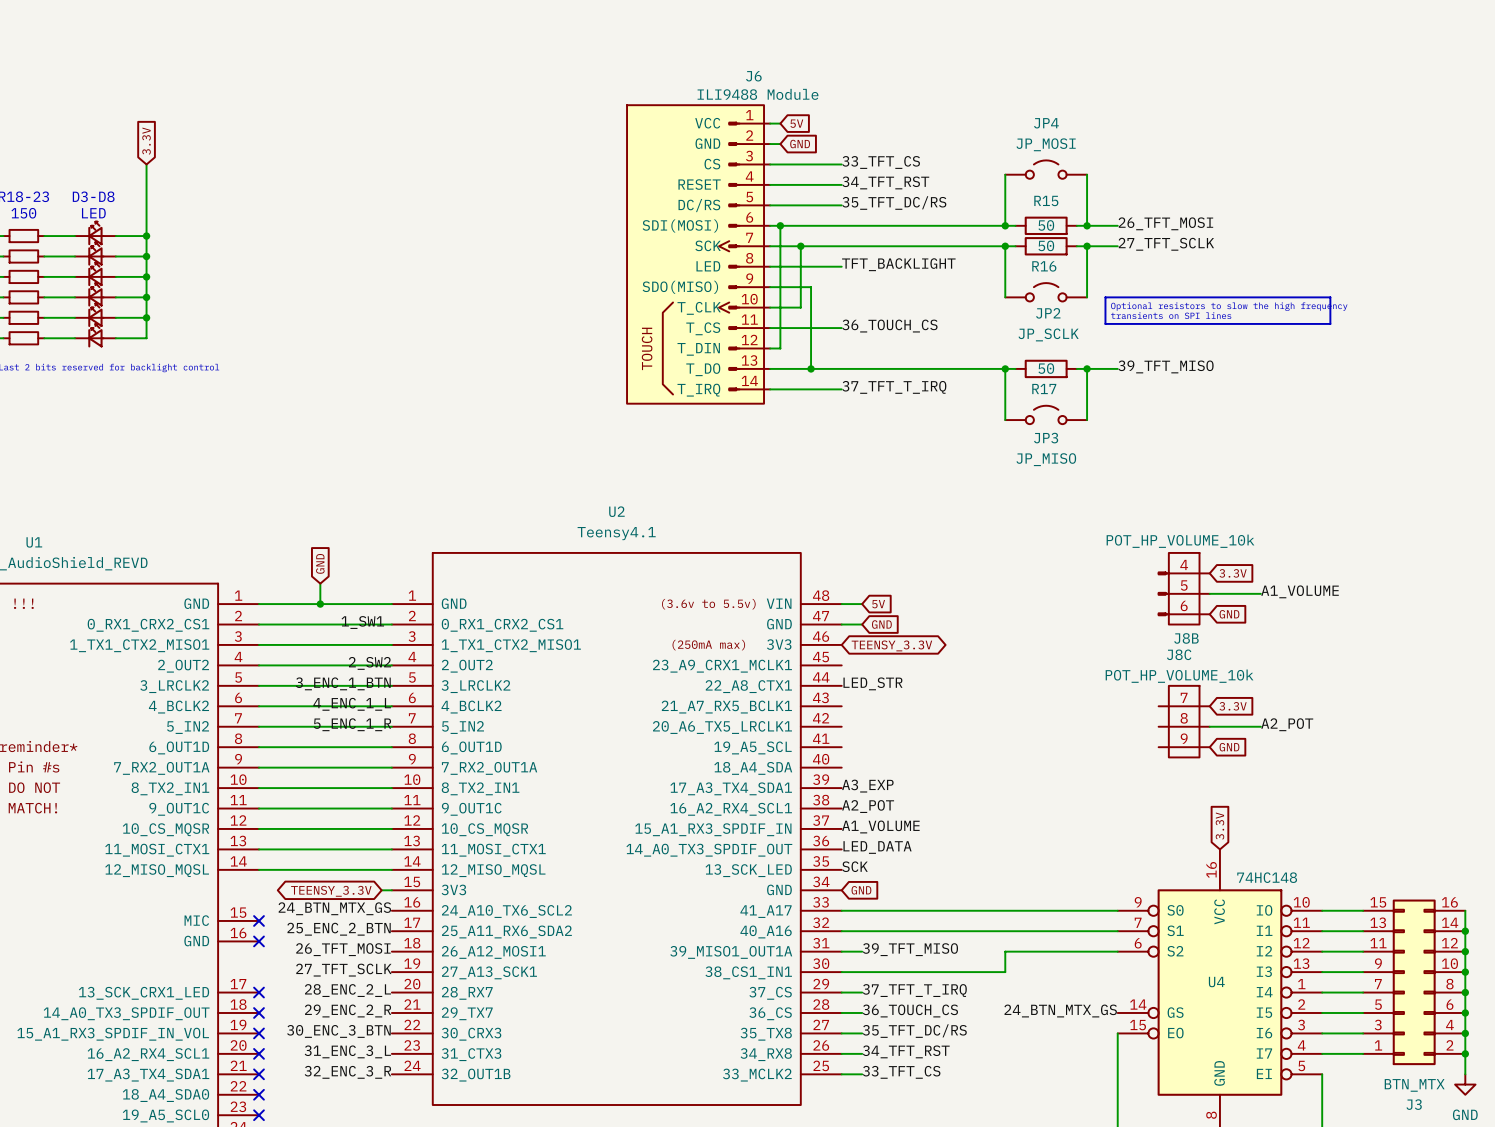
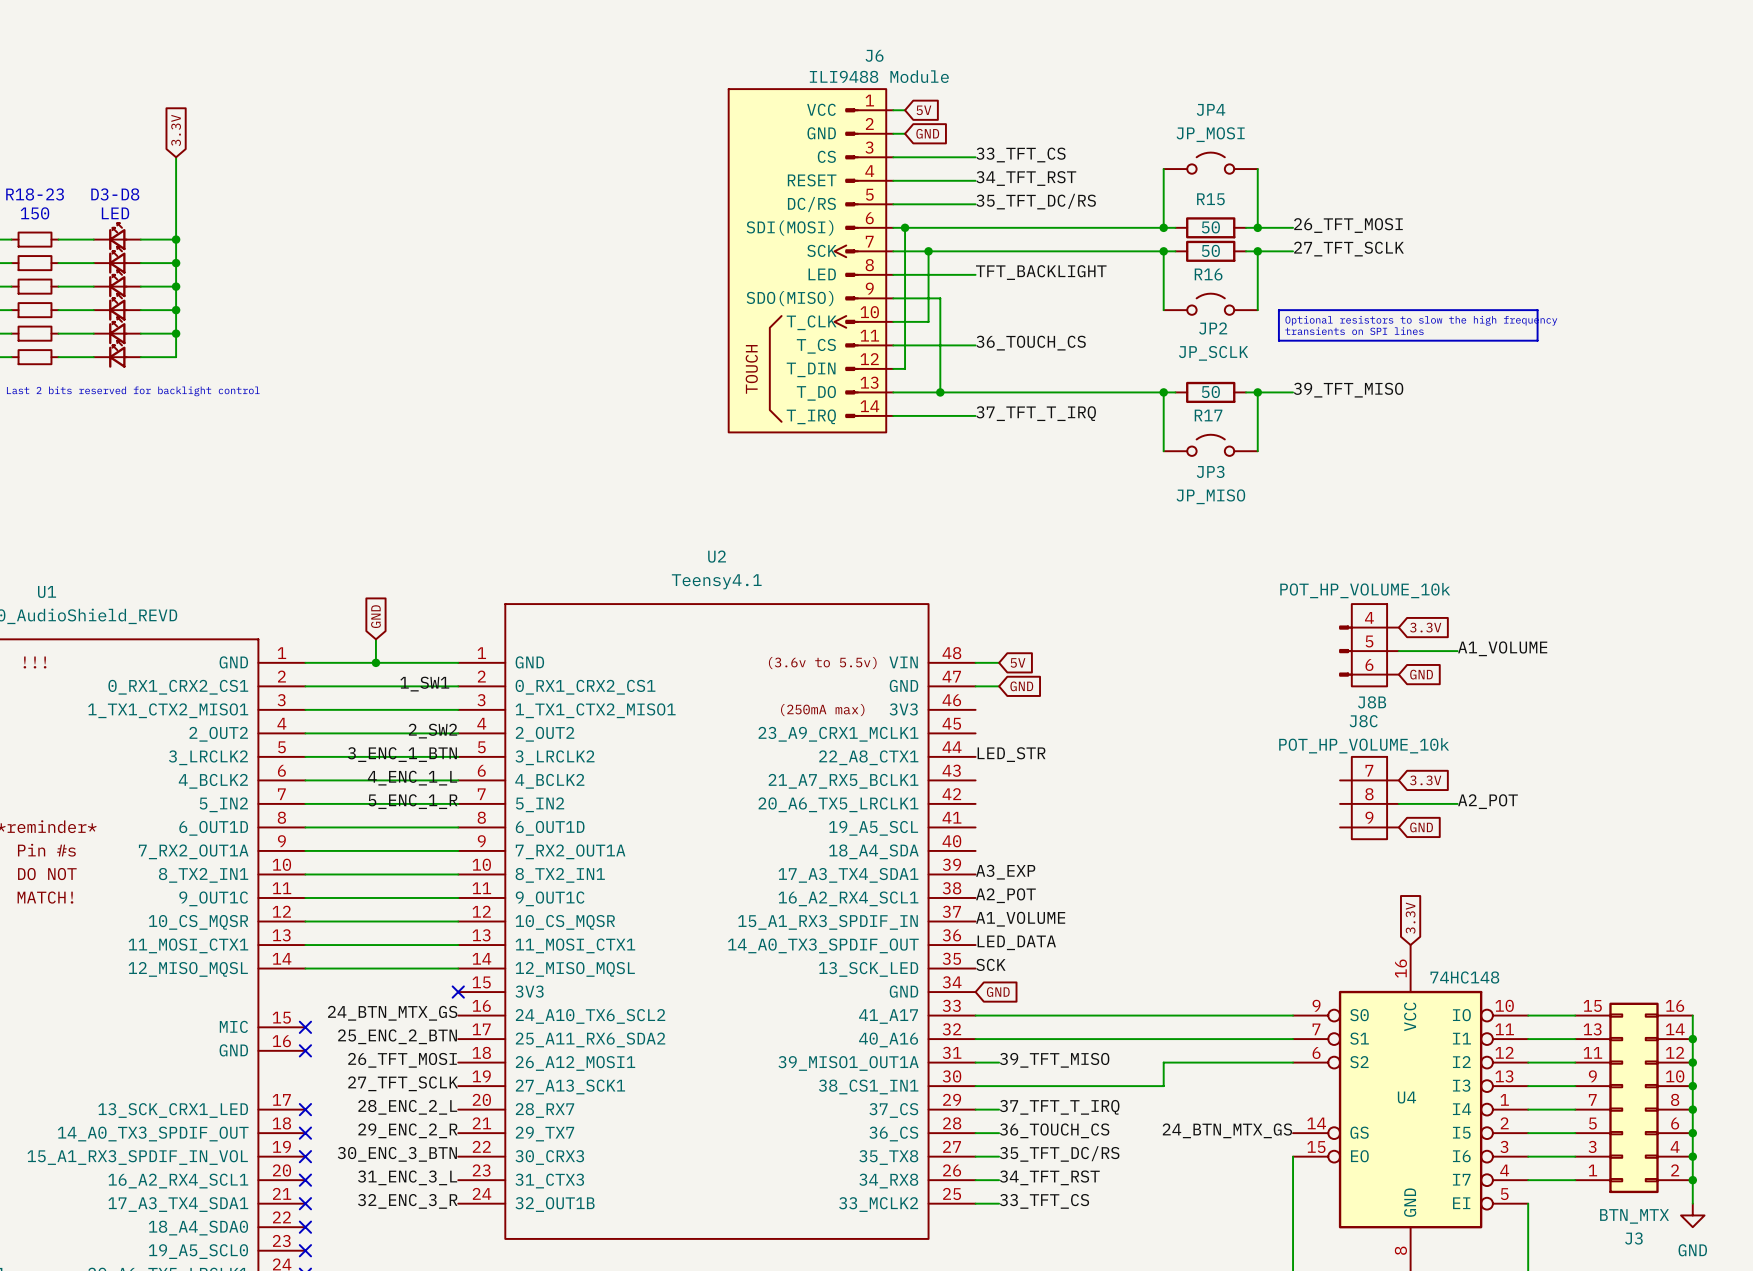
global label: TEENSY_3.3V (891, 645) -> none
wire: (381, 890) (391, 890) -> none
no-connect mark: none -> (458, 992)
global label: TEENSY_3.3V (331, 891) -> none

